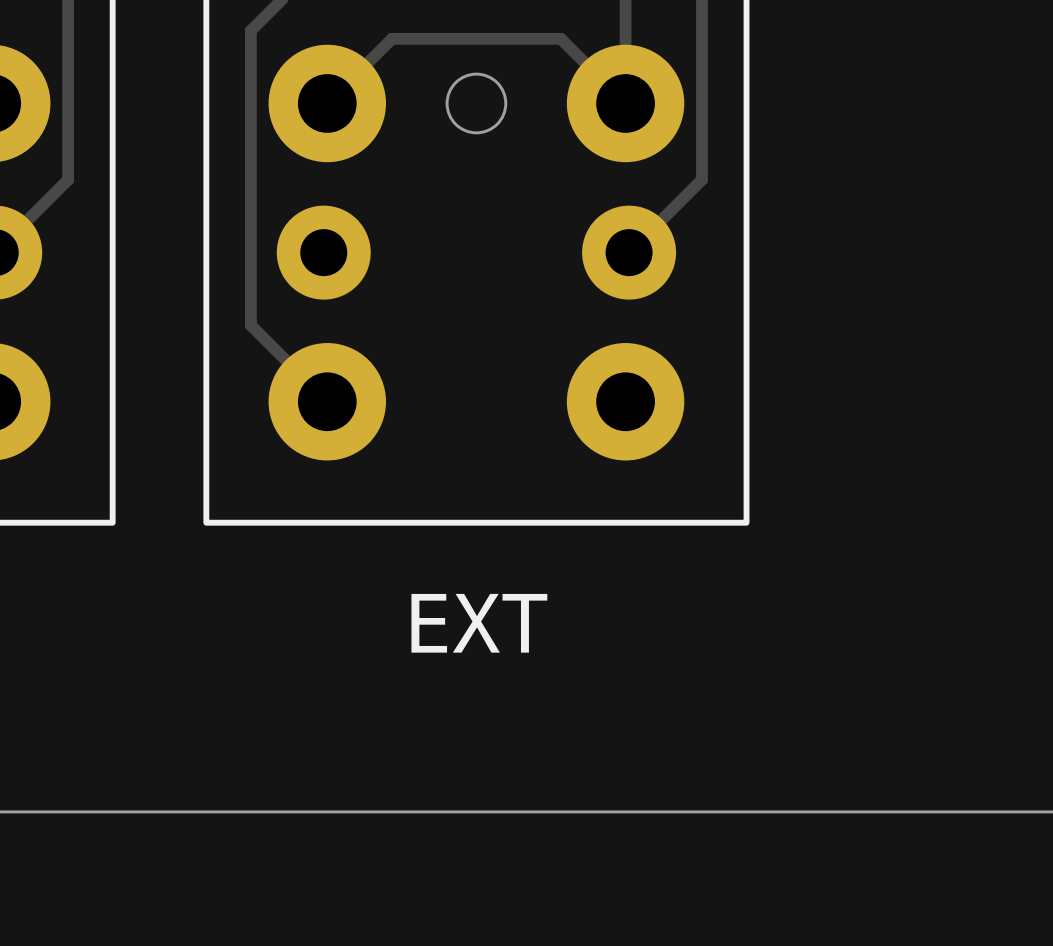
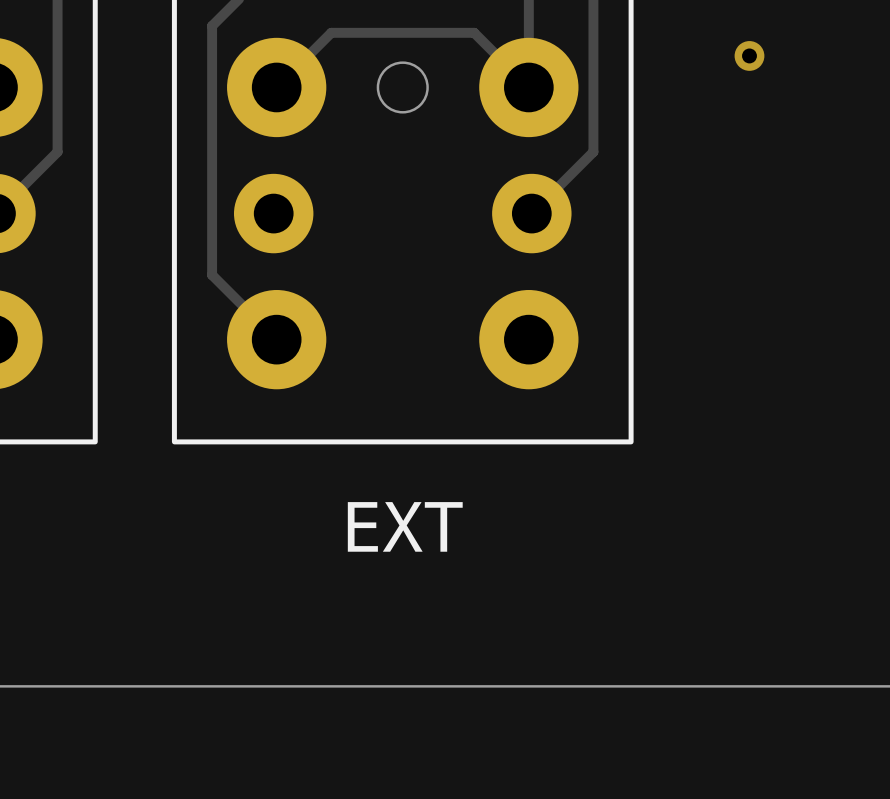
via: none -> (749, 55)

